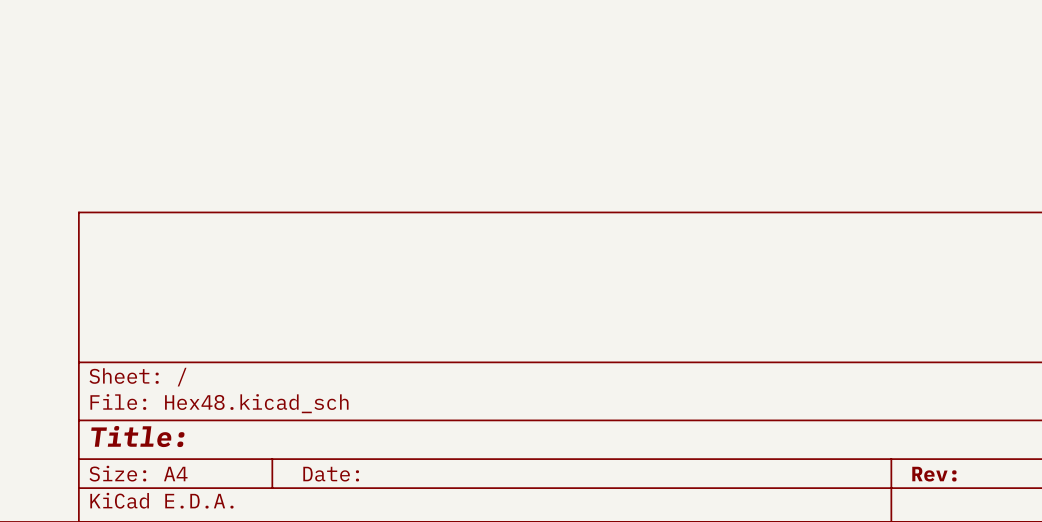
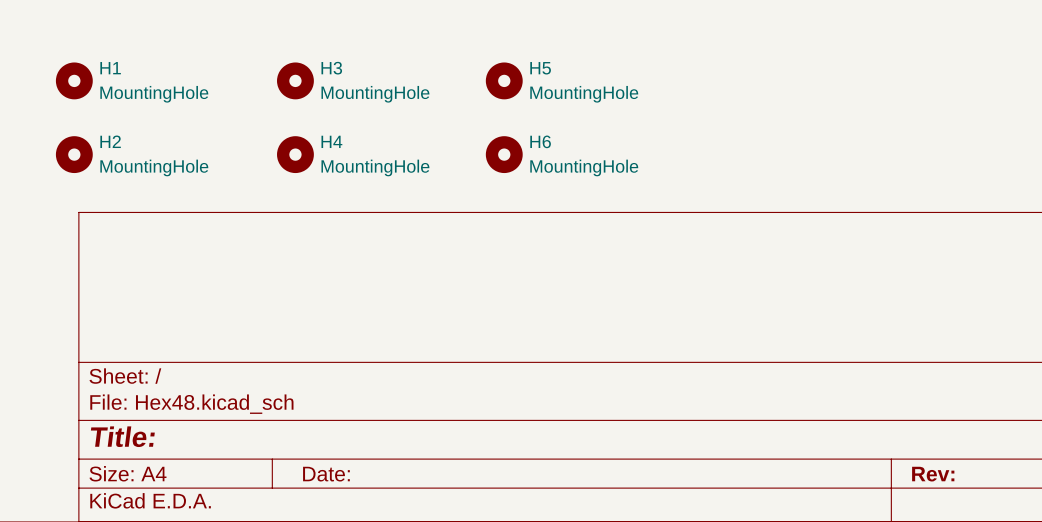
H1: none -> MountingHole (74, 80)
H3: none -> MountingHole (295, 80)
H5: none -> MountingHole (504, 80)
H2: none -> MountingHole (74, 154)
H4: none -> MountingHole (295, 154)
H6: none -> MountingHole (504, 154)

